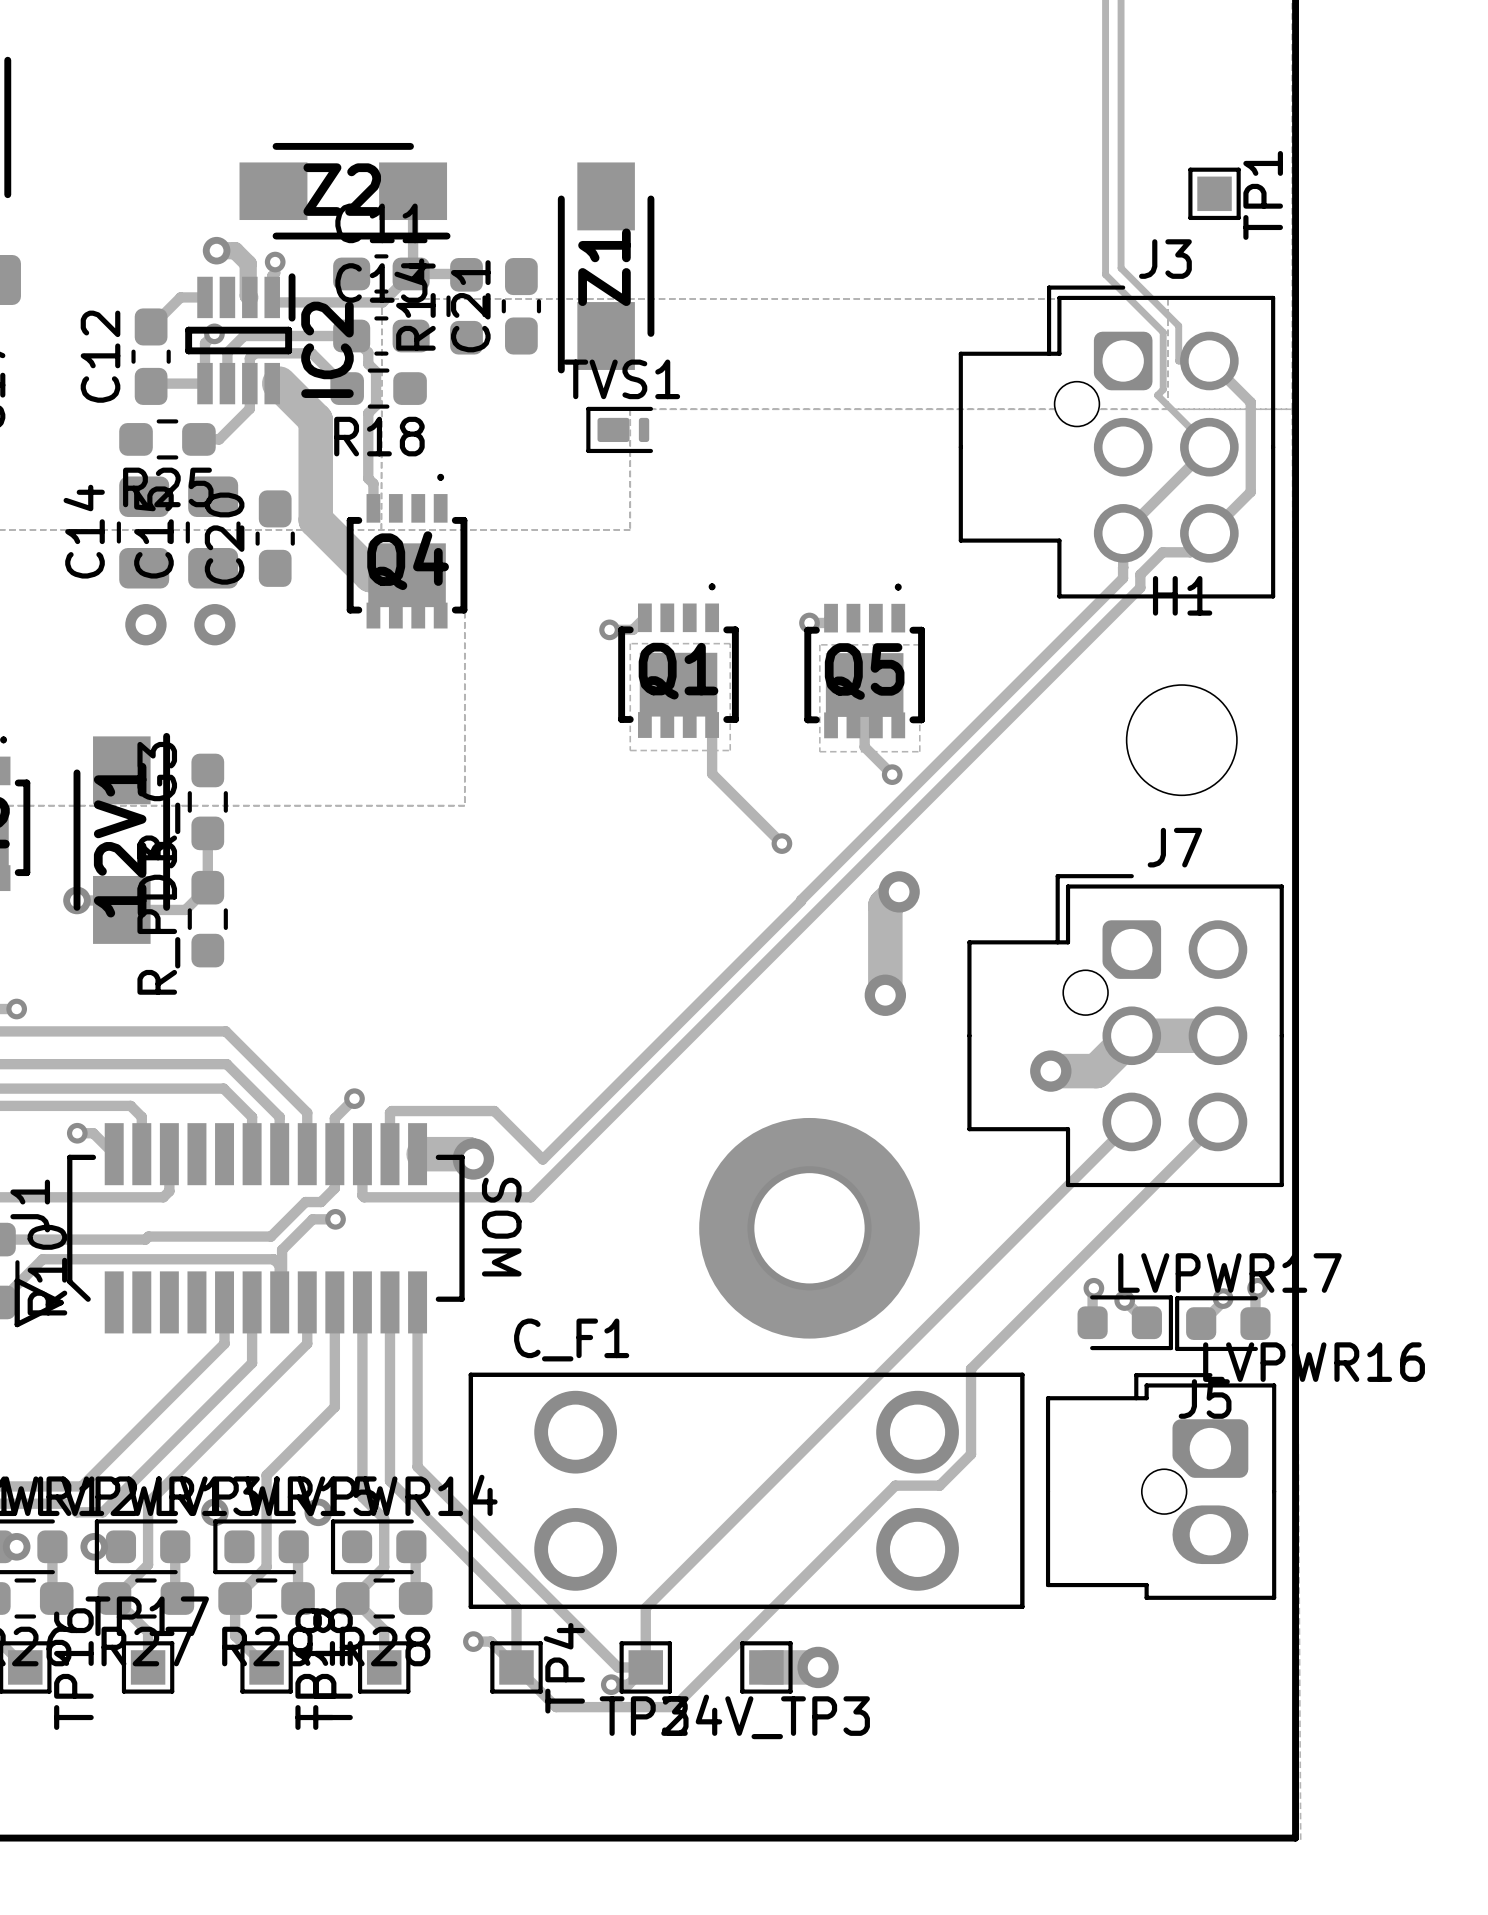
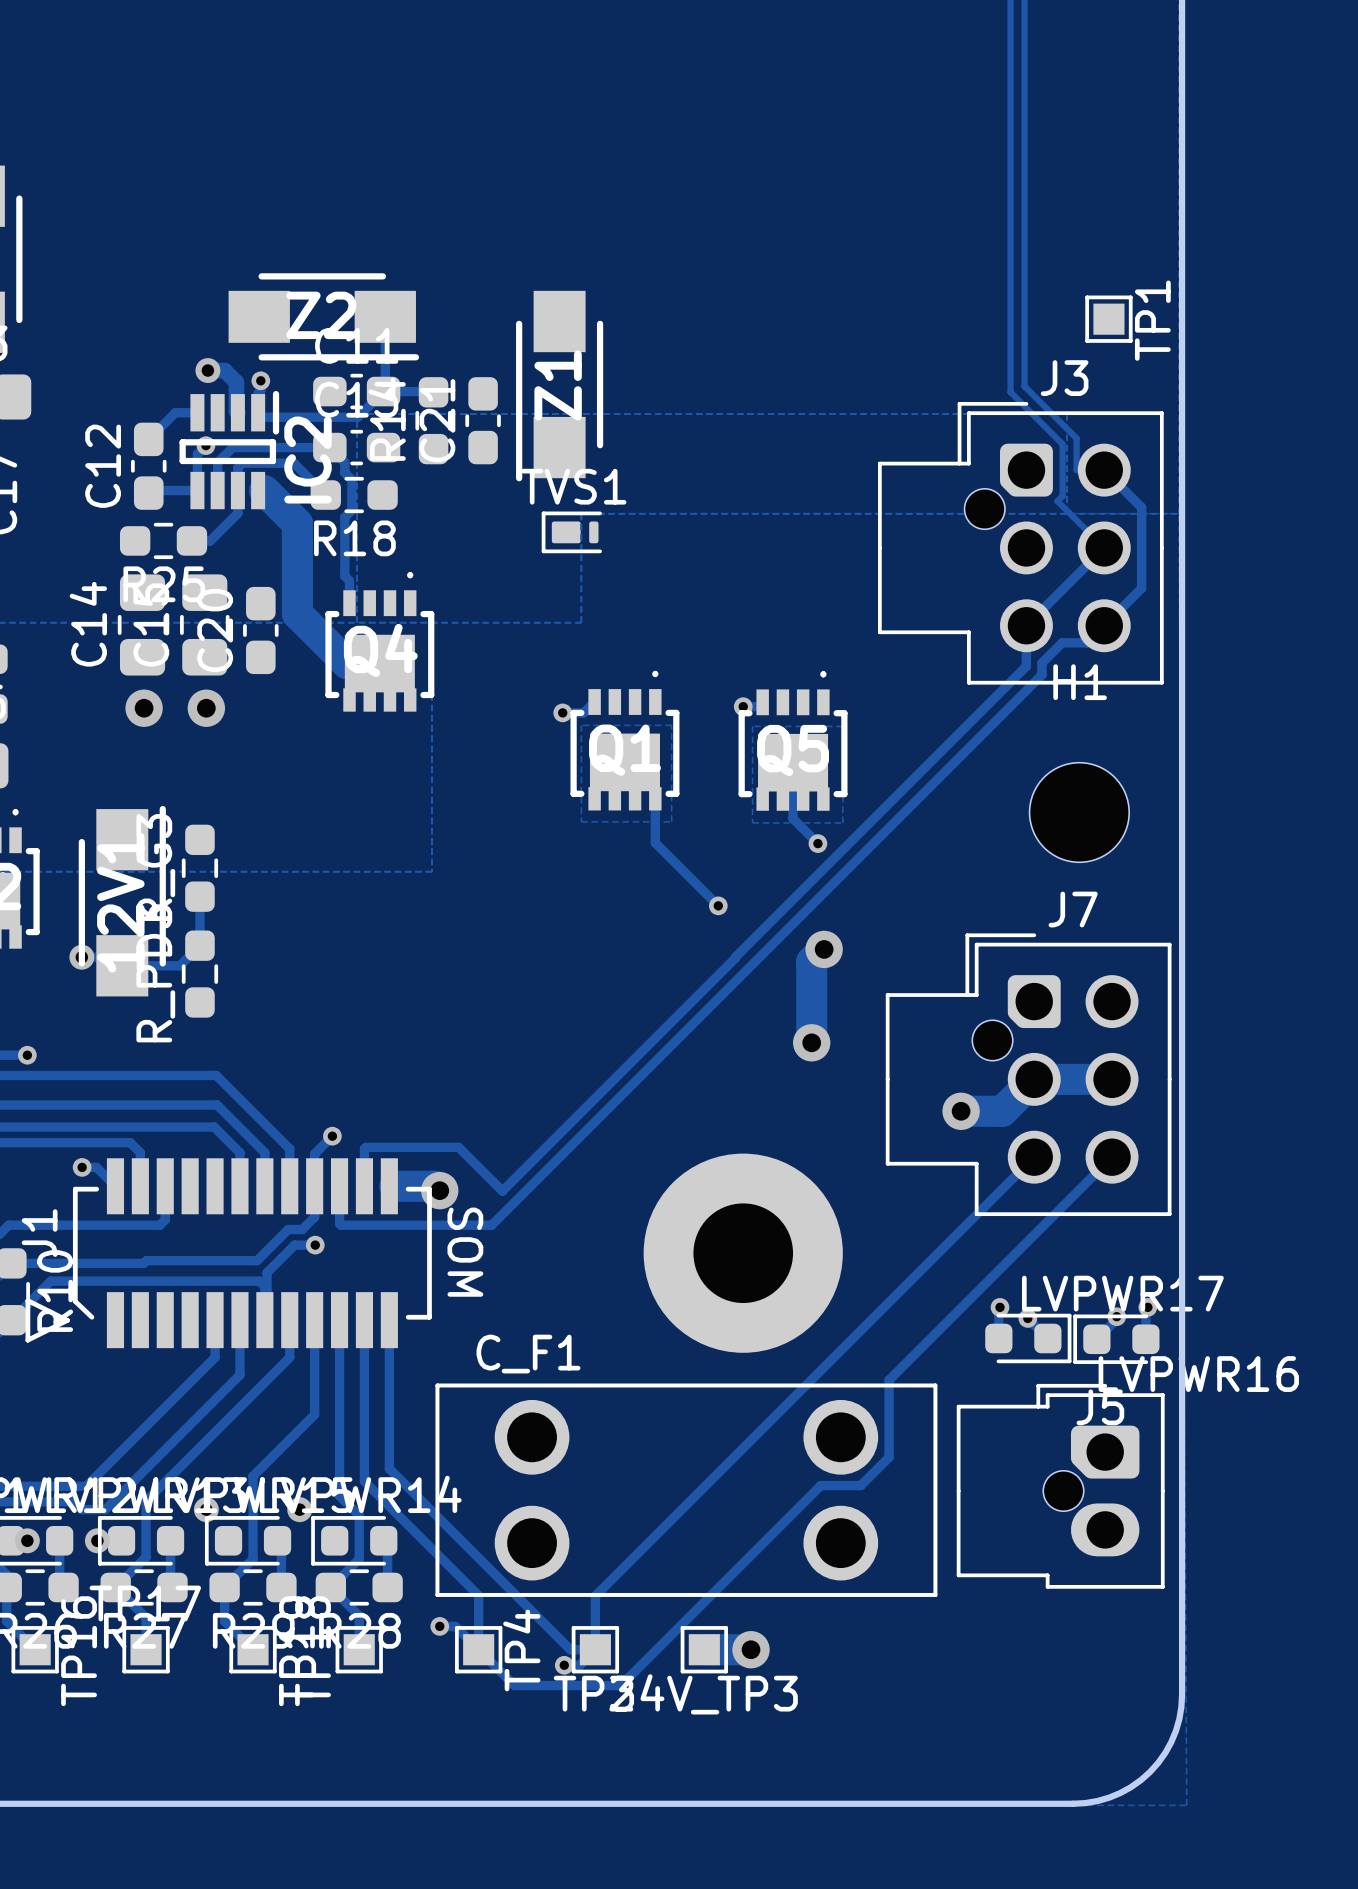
board edge: (1295, 1717) (1295, 1838) (1174, 1838) -> (1182, 1694) (1175, 1730) (1165, 1752) (1150, 1771) (1131, 1787) (1109, 1797) (1073, 1803)

